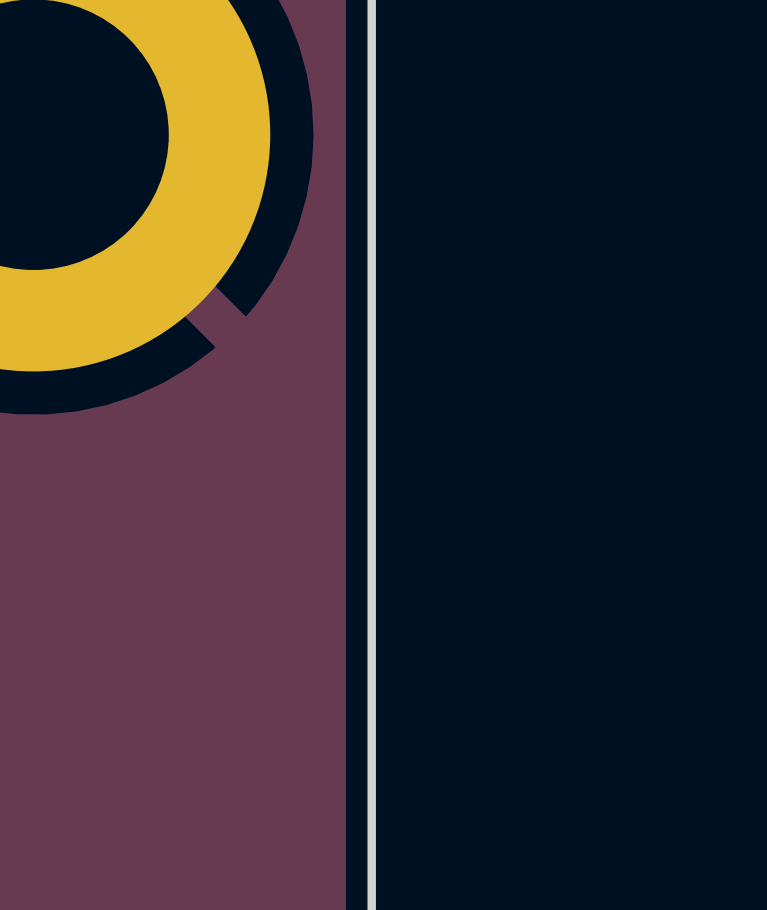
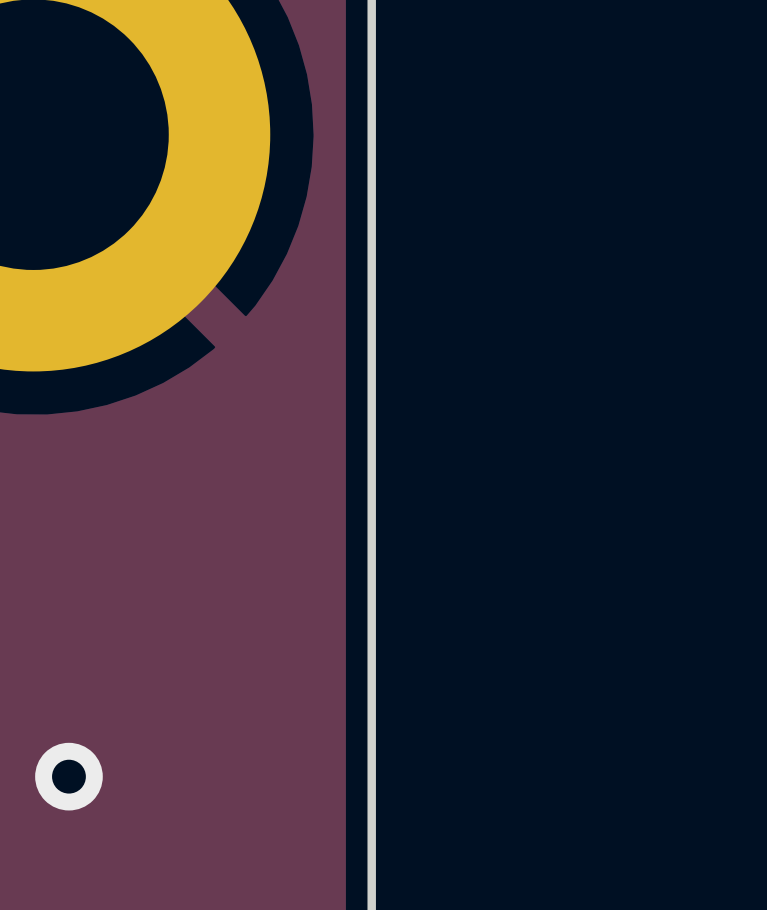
via: none -> (68, 776)

